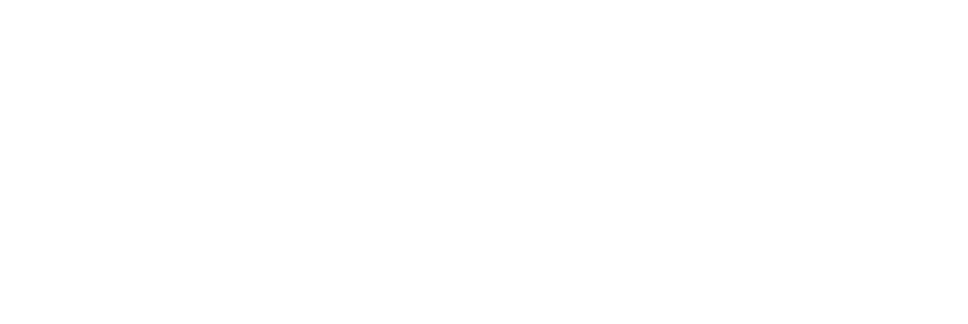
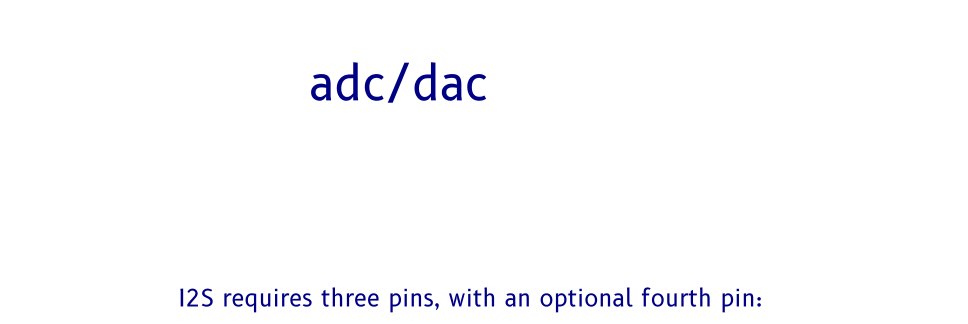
text: none -> adc/dac (398, 82)
text: none -> I2S requires three pins, with an optional fourth pin: (470, 299)

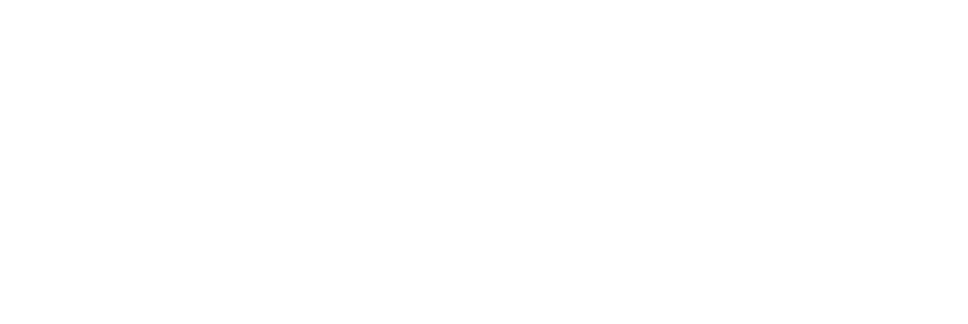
text: adc/dac (398, 82) -> none
text: I2S requires three pins, with an optional fourth pin: (470, 299) -> none

